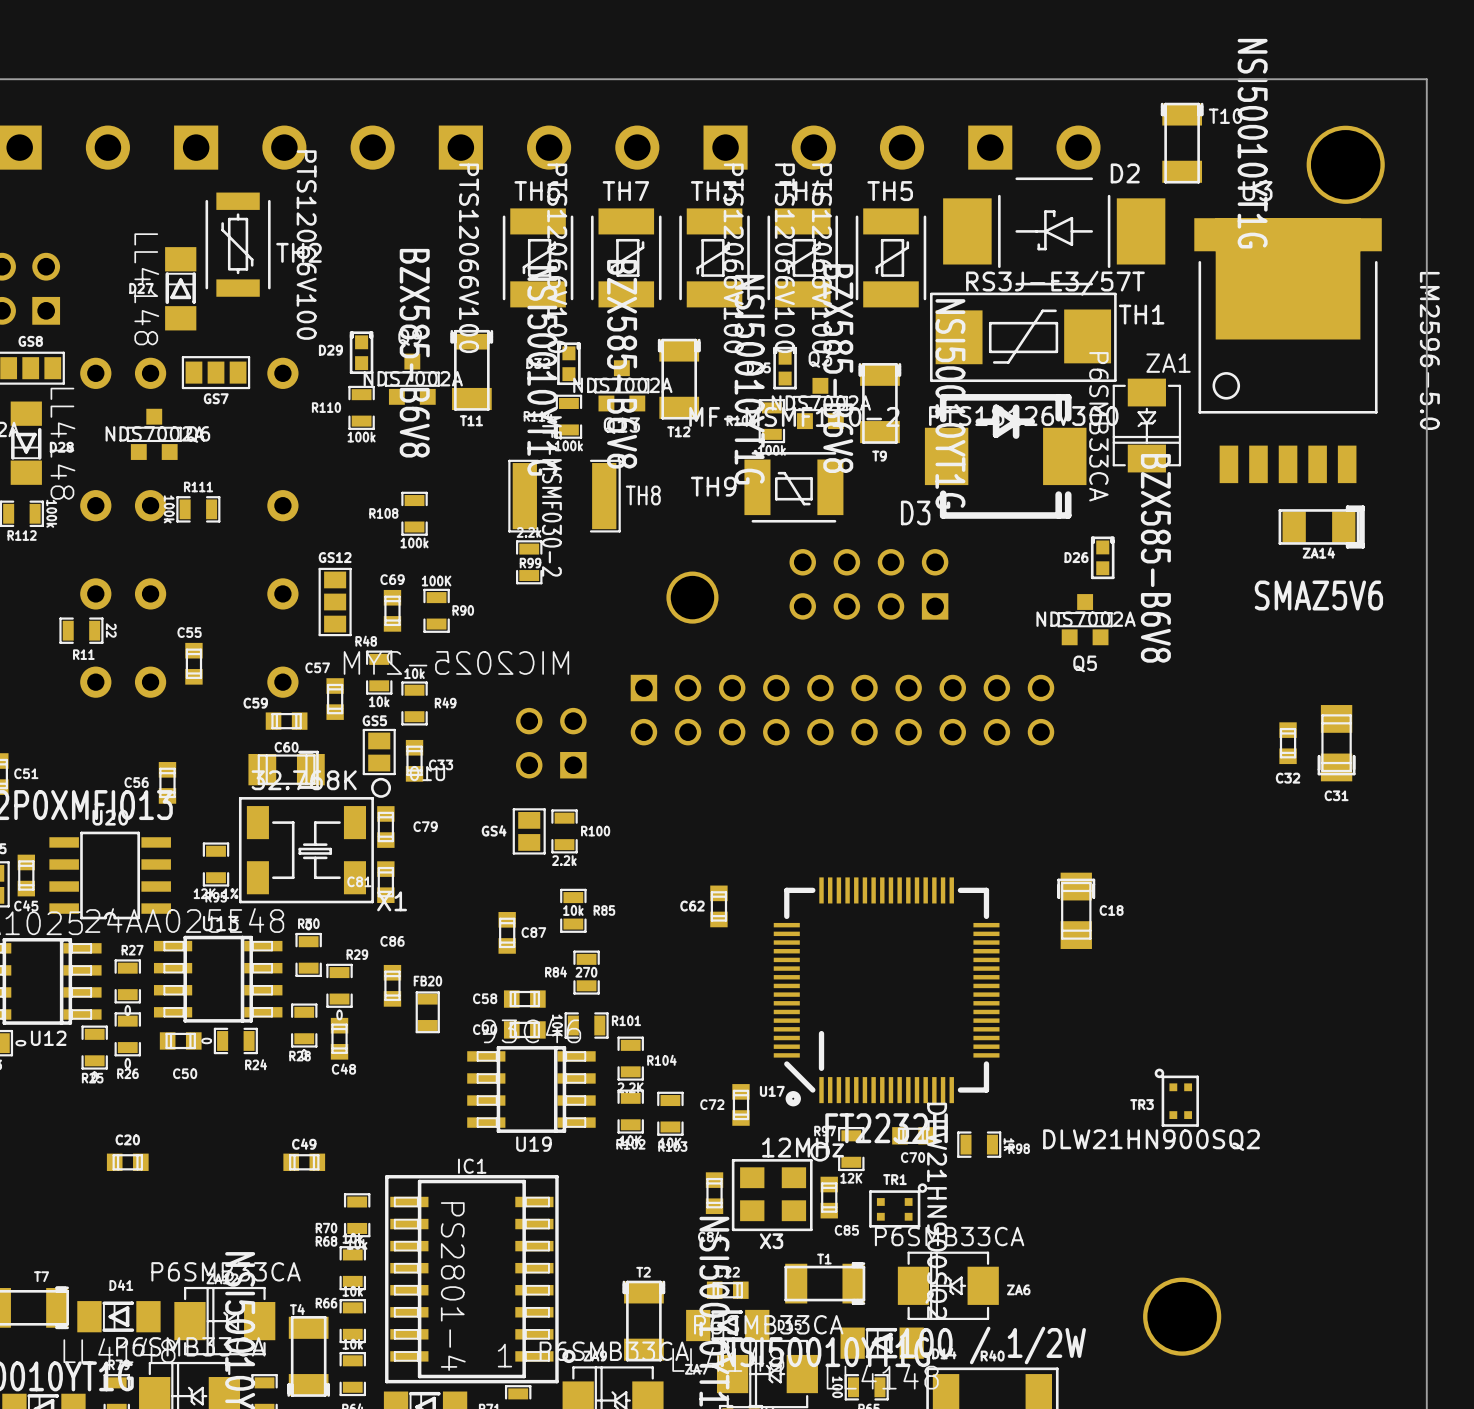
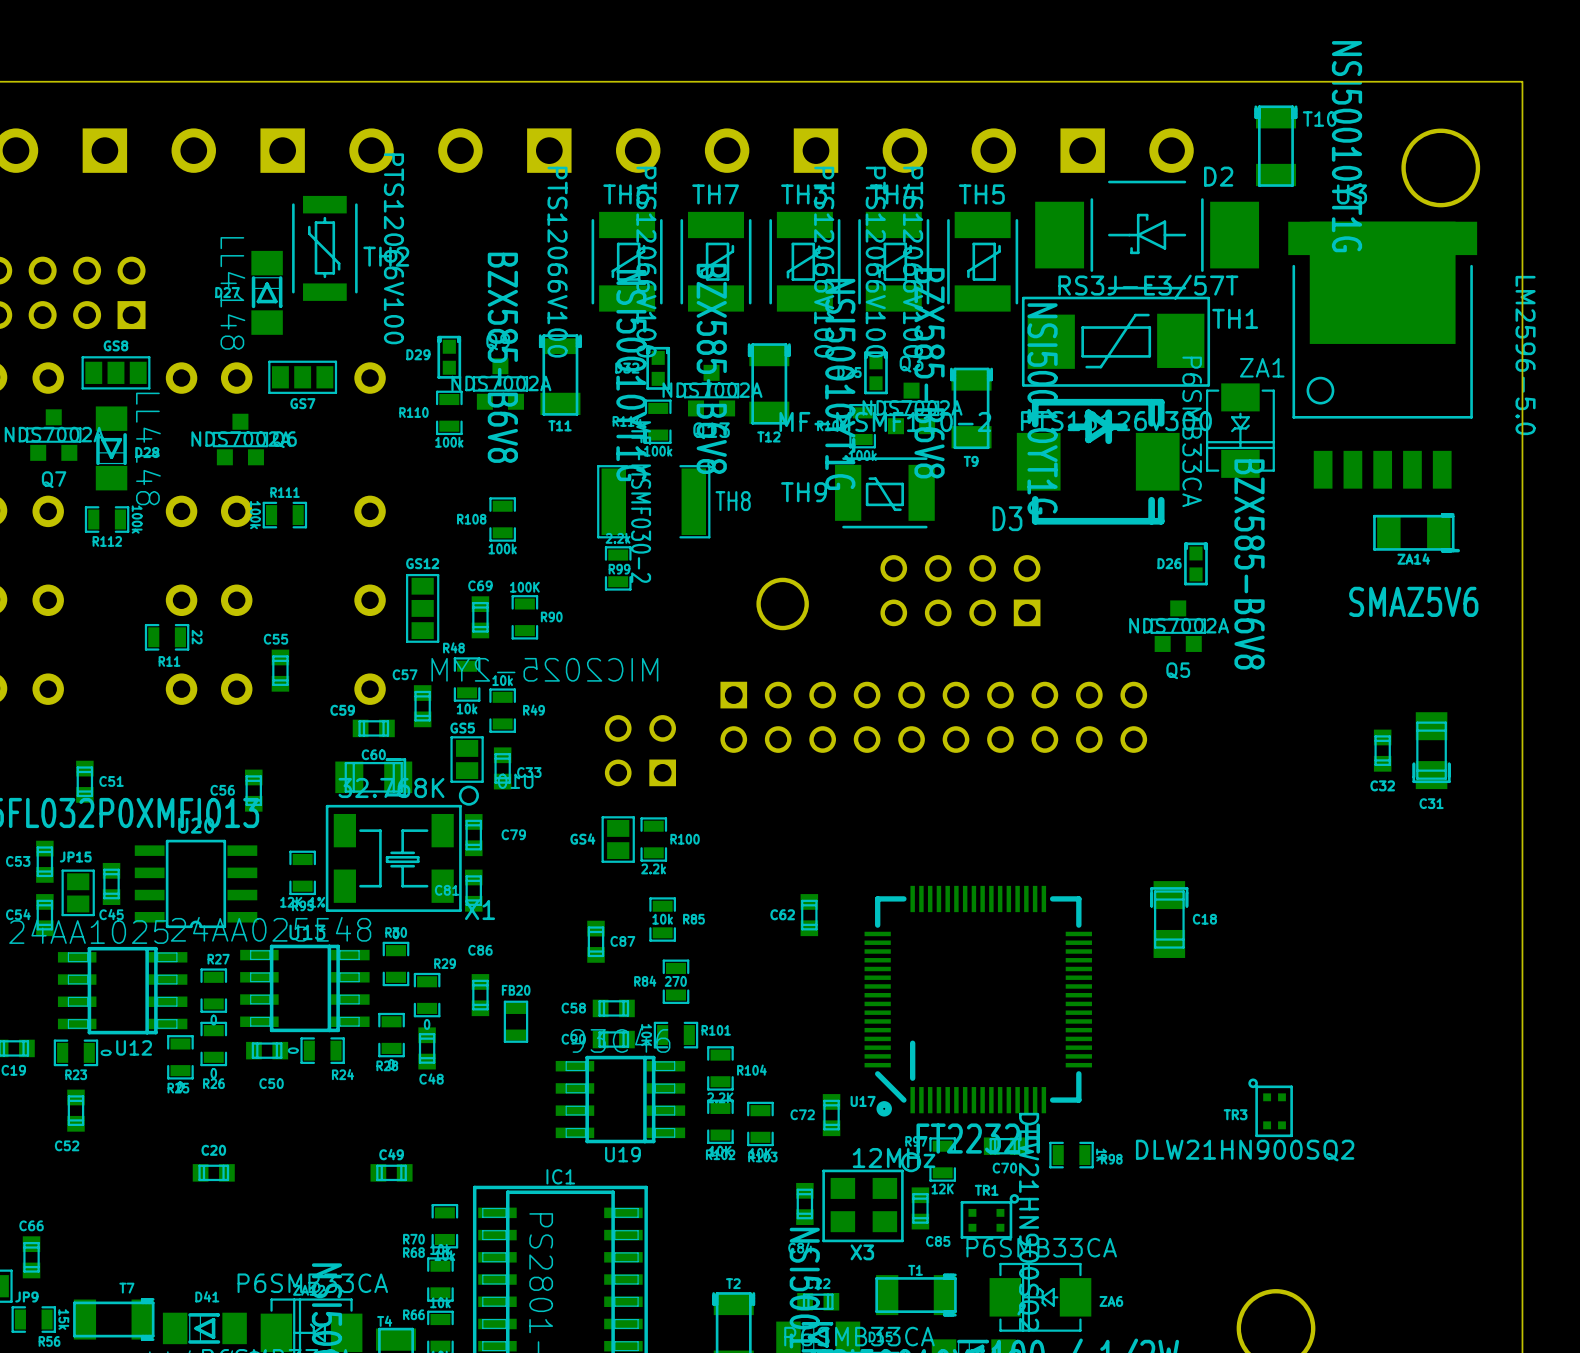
line: (1347, 509) (1347, 507) (1363, 507) (1363, 546) (1347, 546) (1347, 544) -> none
line: (1360, 509) (1360, 542) (1358, 542) -> none

